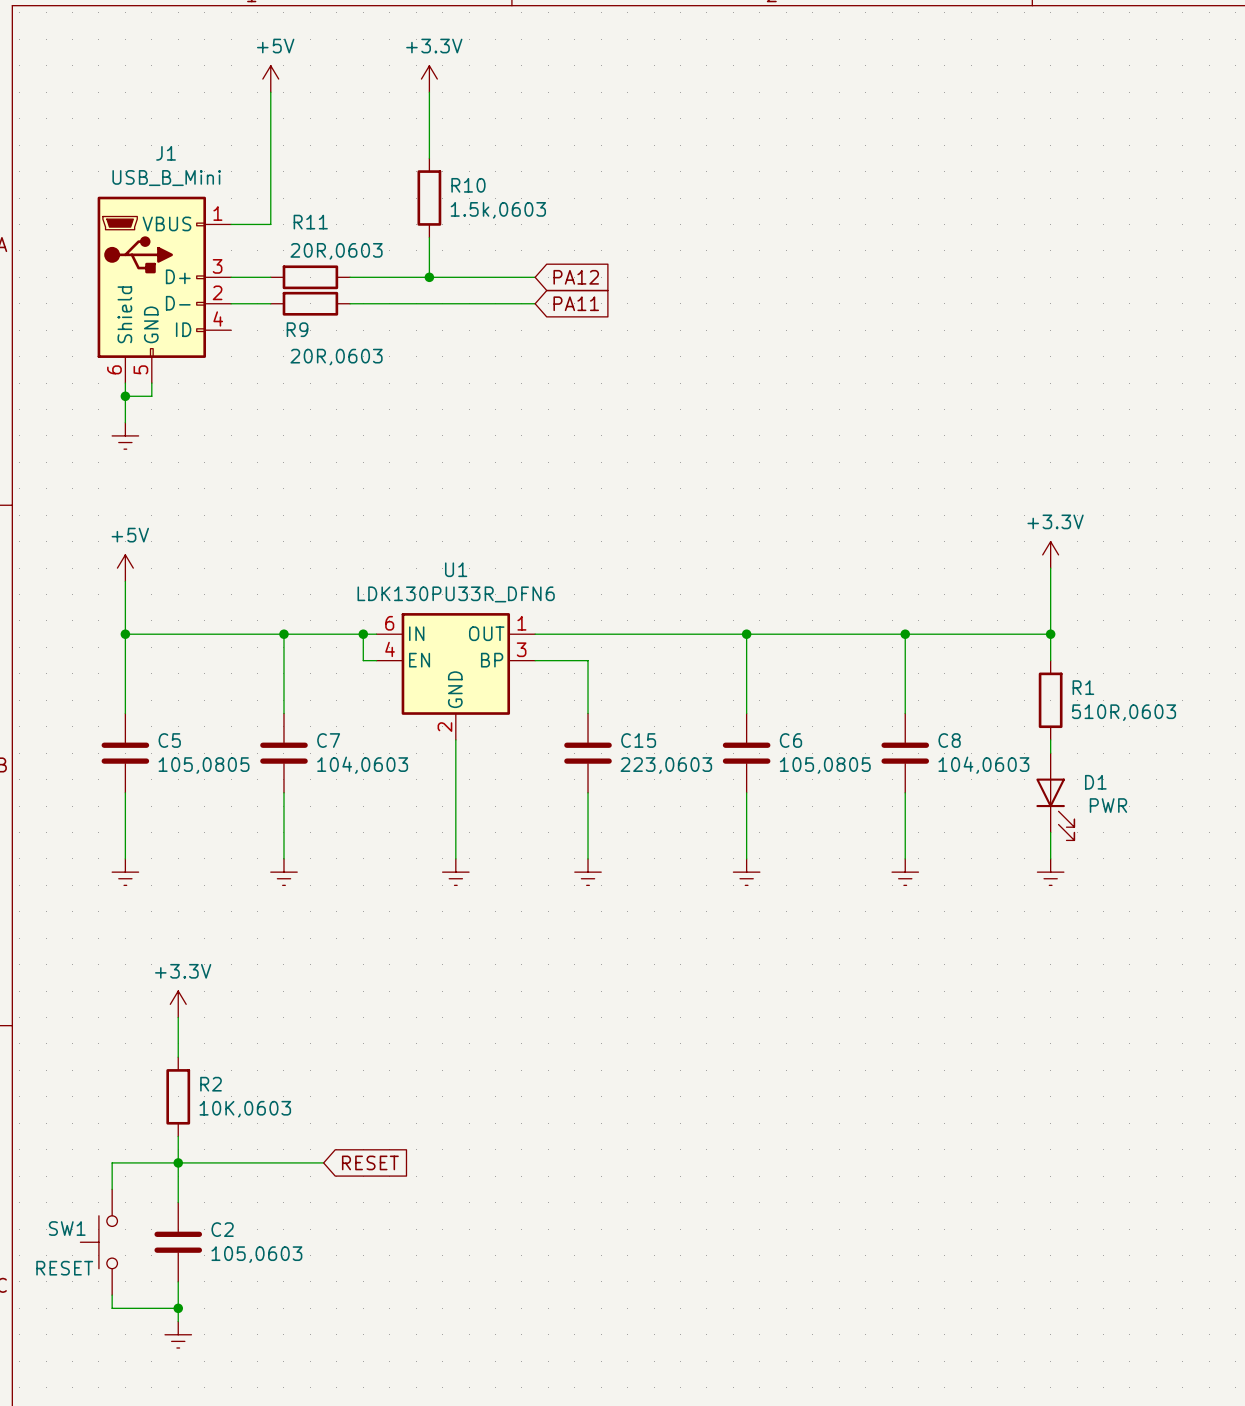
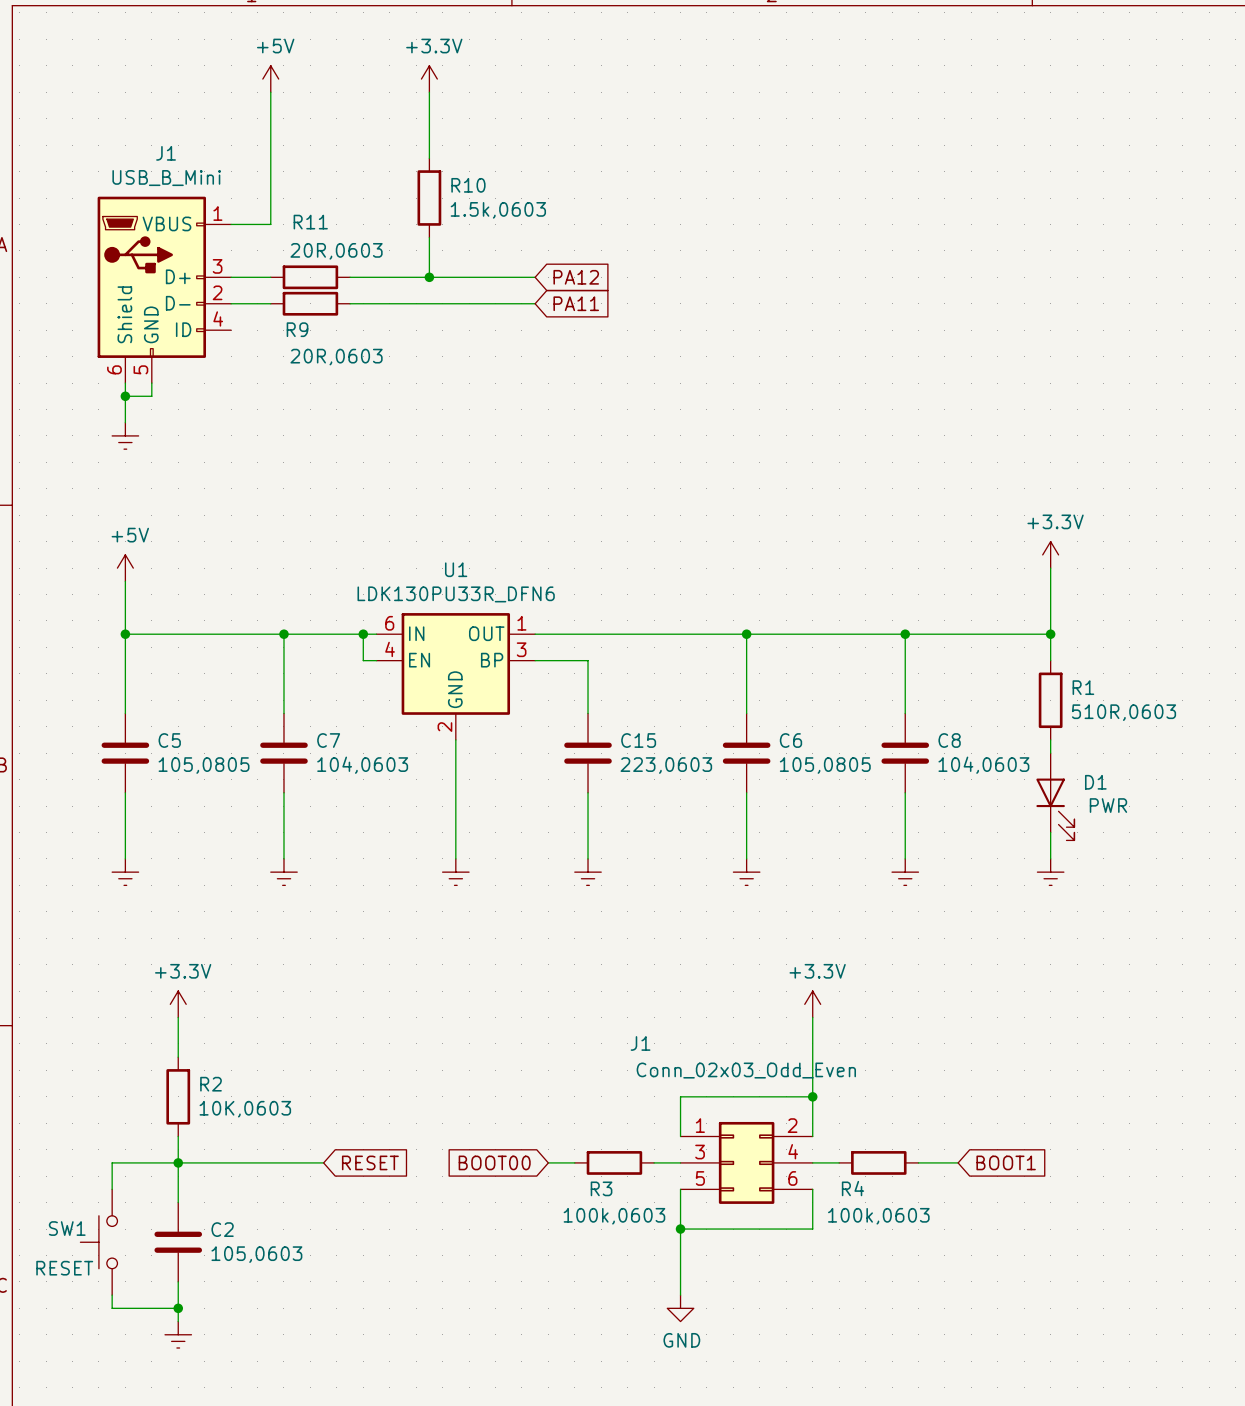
power symbol: none -> +3.3V (812, 1004)
wire: none -> (812, 1017) (812, 1136)
wire: none -> (812, 1096) (680, 1096) (680, 1136)
junction: none -> (812, 1096)
global label: none -> BOOT00 (494, 1162)
wire: none -> (548, 1162) (574, 1162)
R3: none -> 100k,0603 (614, 1162)
wire: none -> (654, 1162) (680, 1162)
J1: none -> Conn_02x03_Odd_Even (746, 1162)
wire: none -> (812, 1162) (839, 1162)
R4: none -> 100k,0603 (878, 1162)
wire: none -> (918, 1162) (958, 1162)
global label: none -> BOOT1 (1006, 1162)
wire: none -> (680, 1189) (680, 1295)
wire: none -> (812, 1189) (812, 1229) (680, 1229)
junction: none -> (680, 1229)
power symbol: none -> GND (680, 1308)

